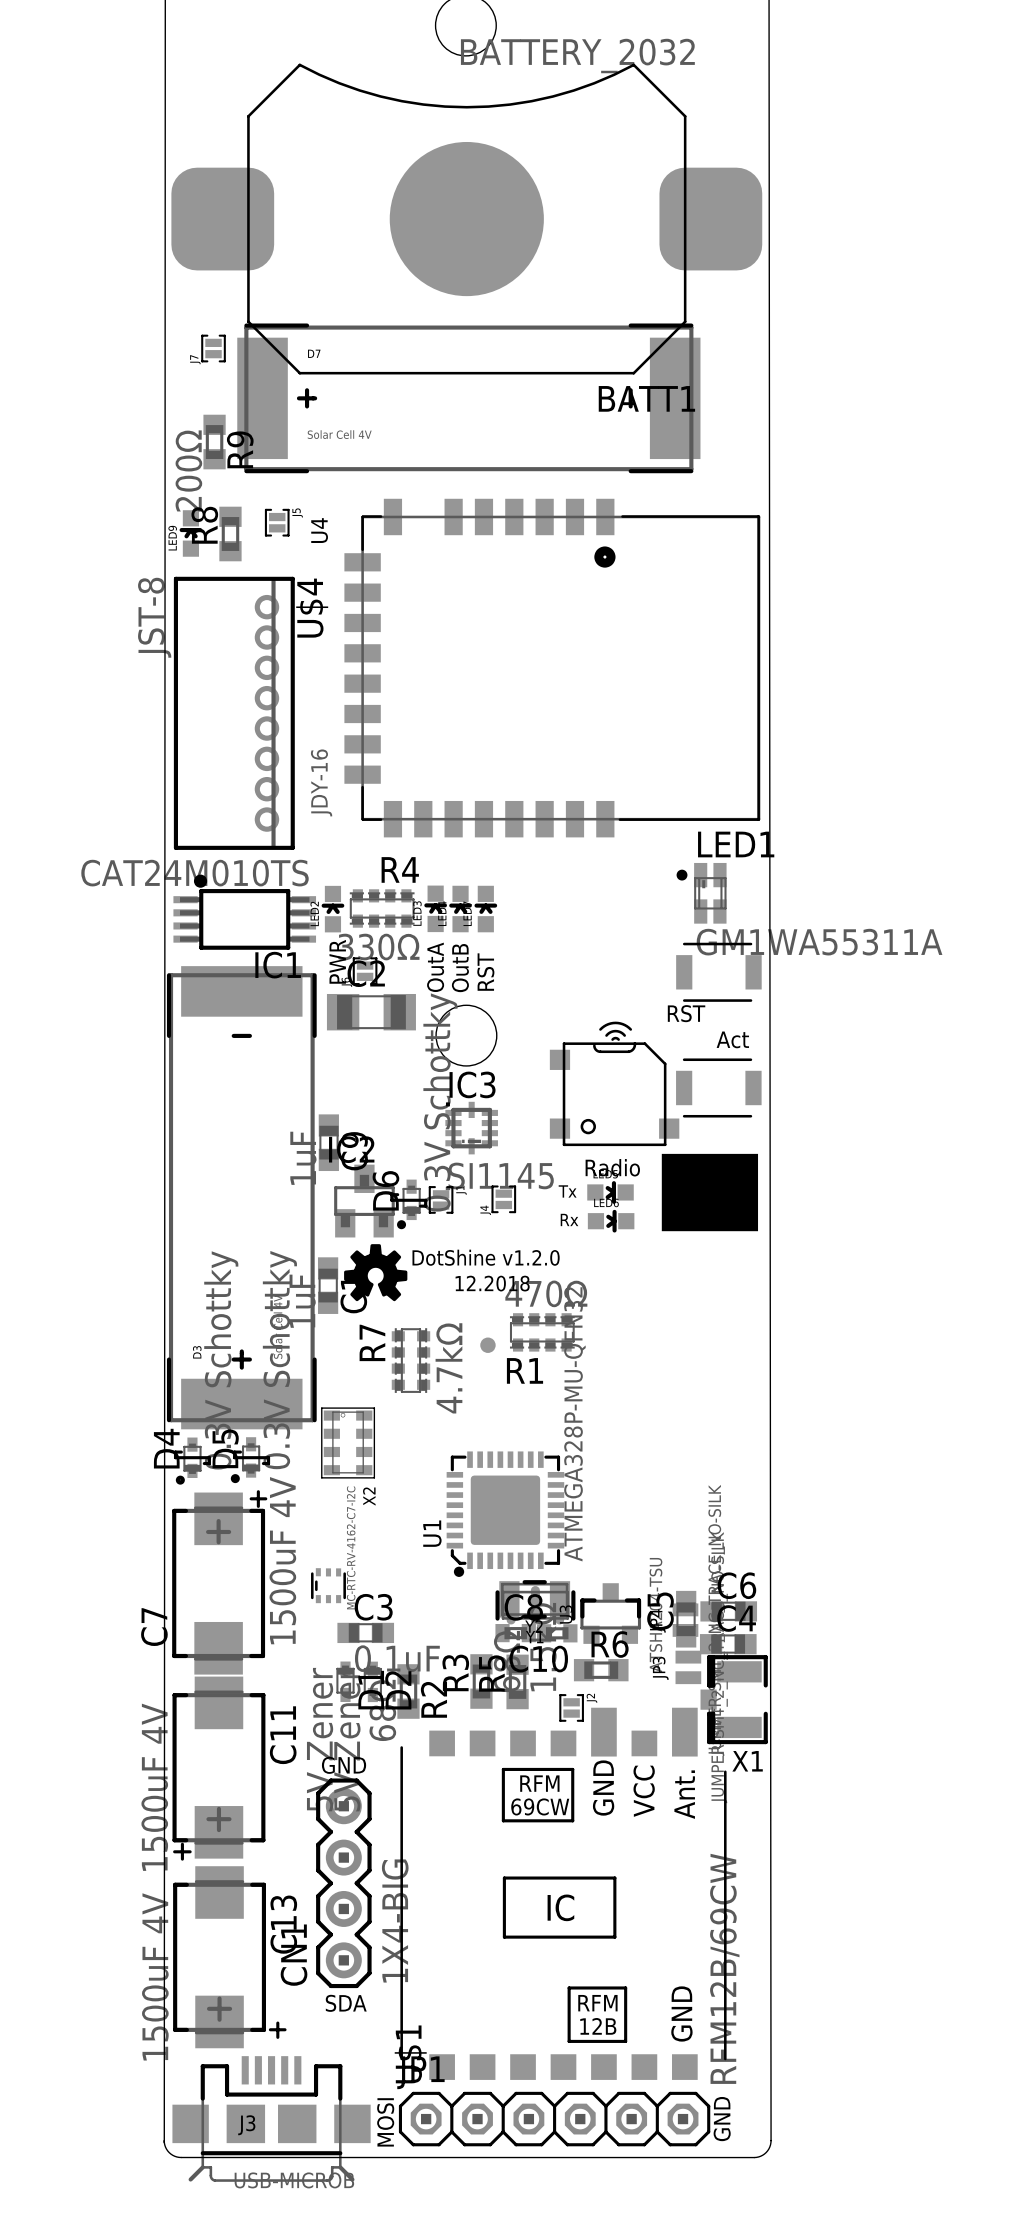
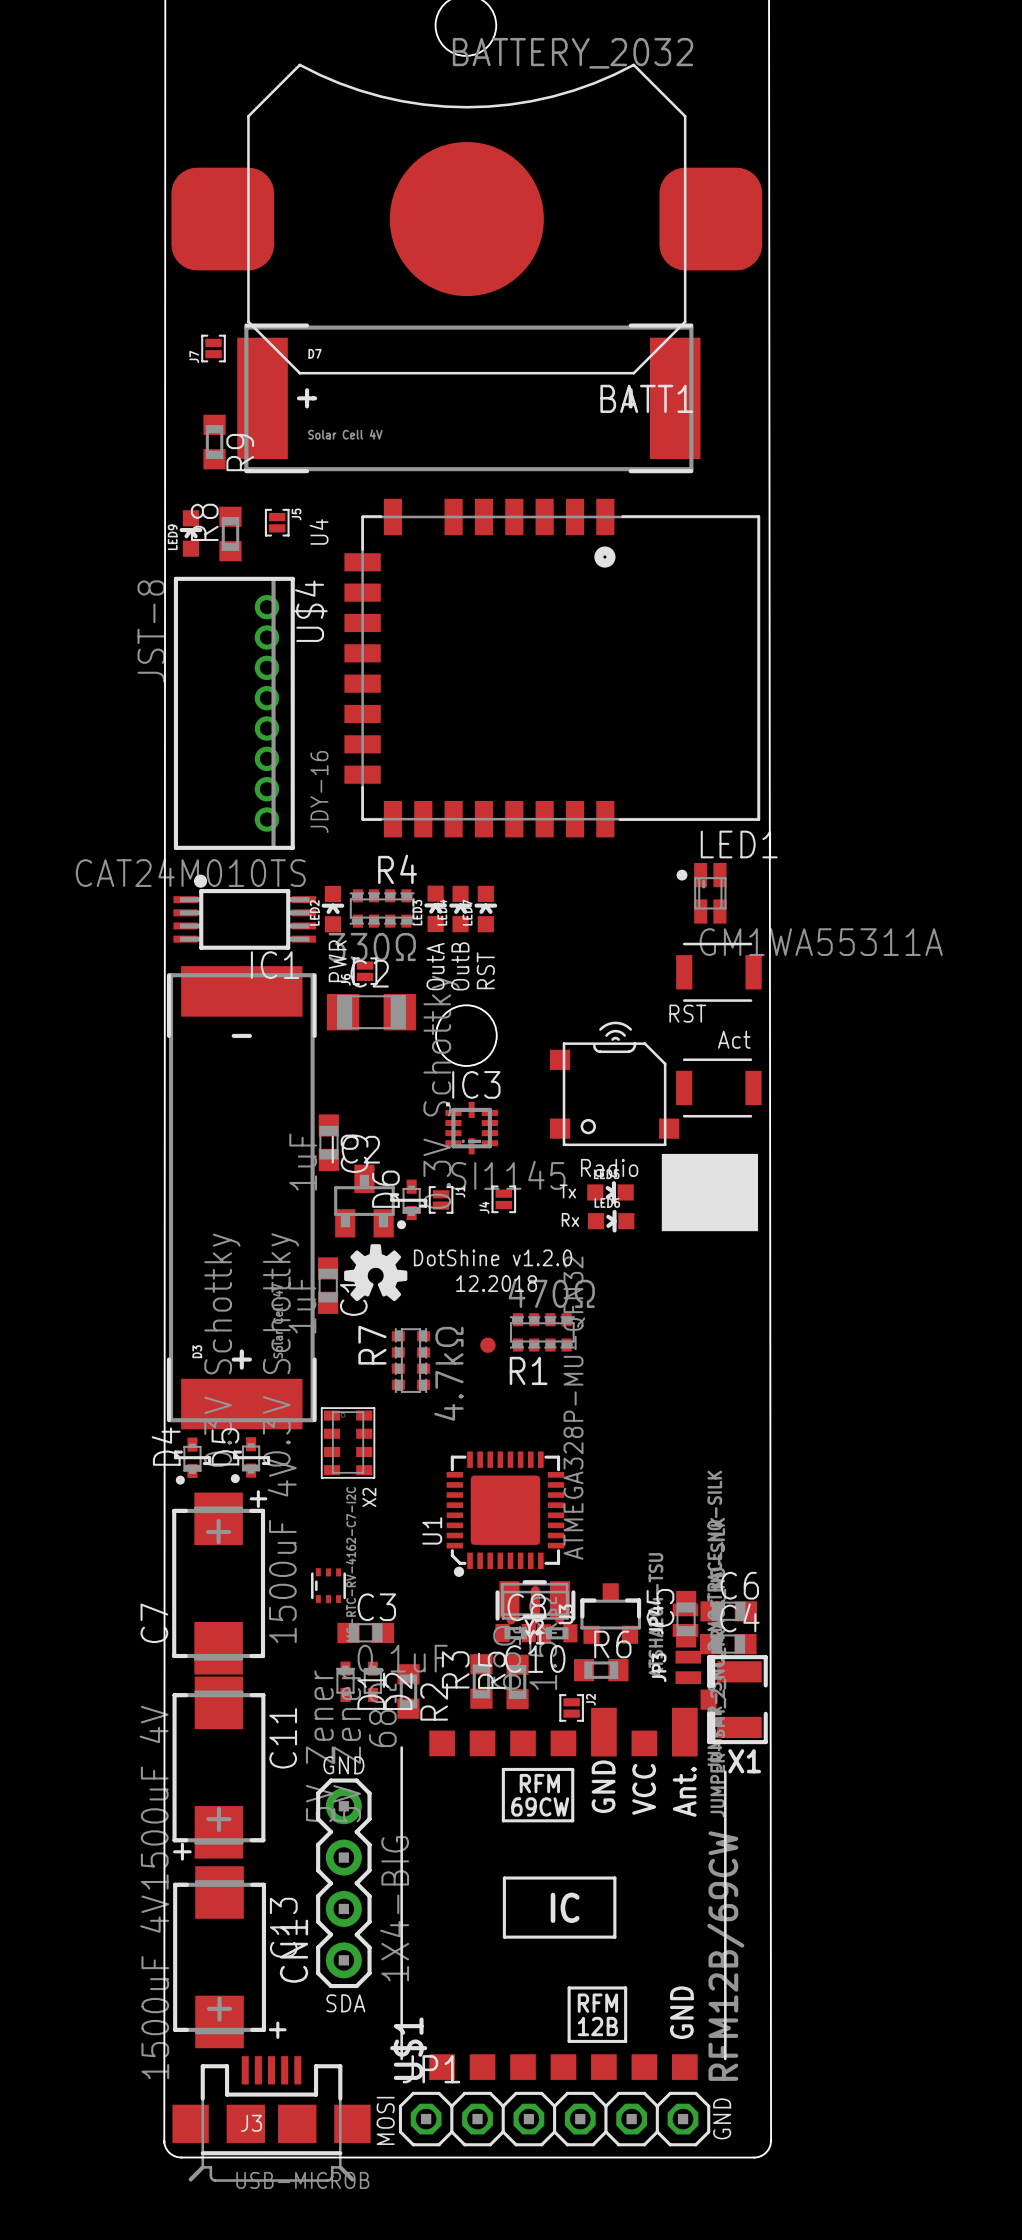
R9 value: 200Ω (188, 471) -> none

